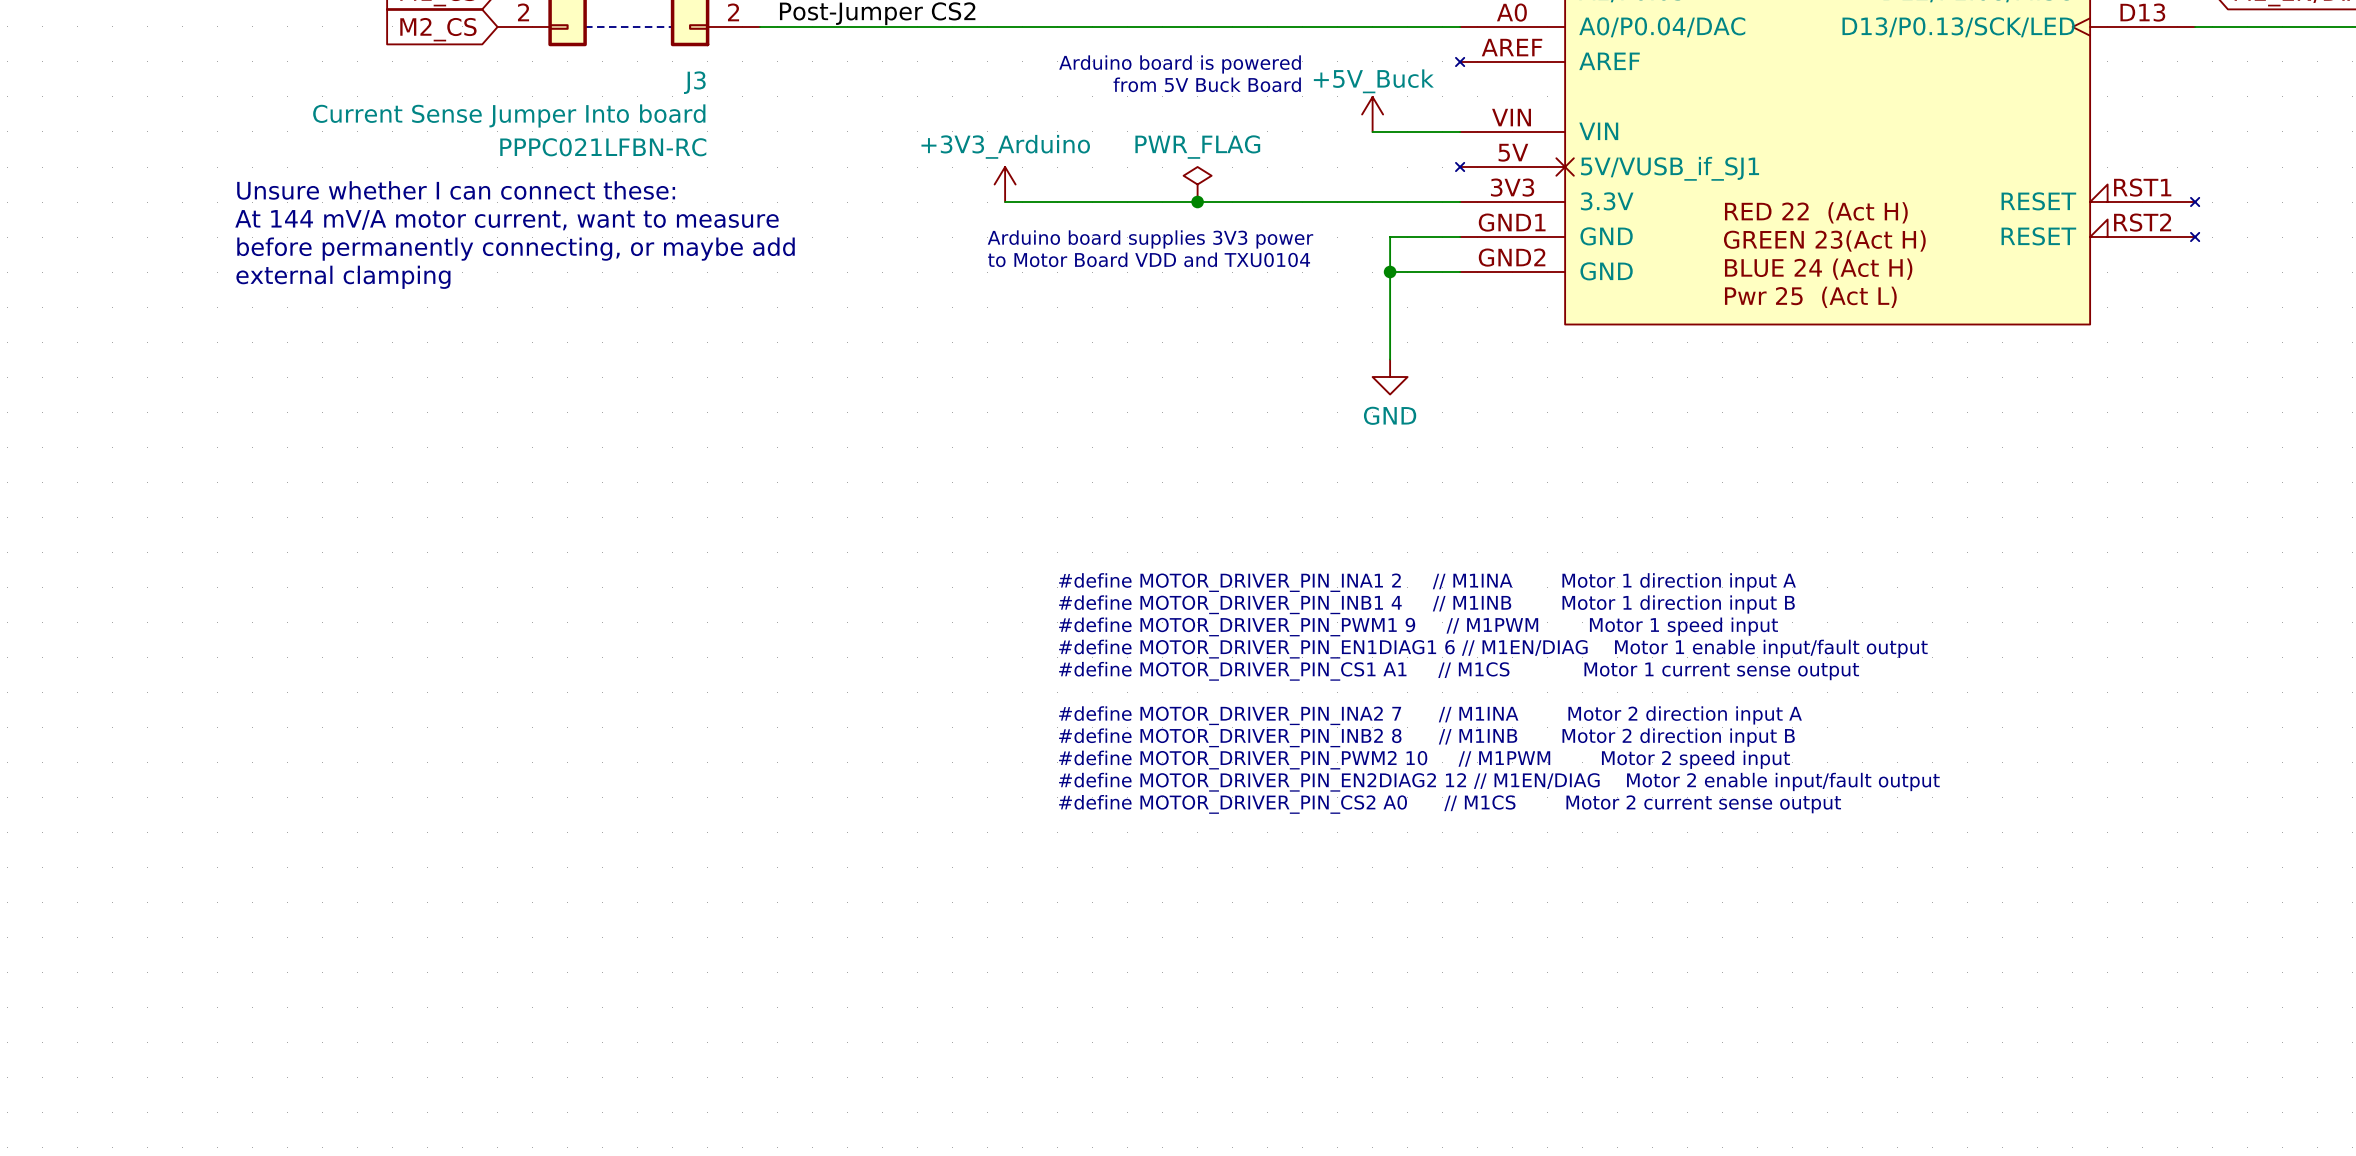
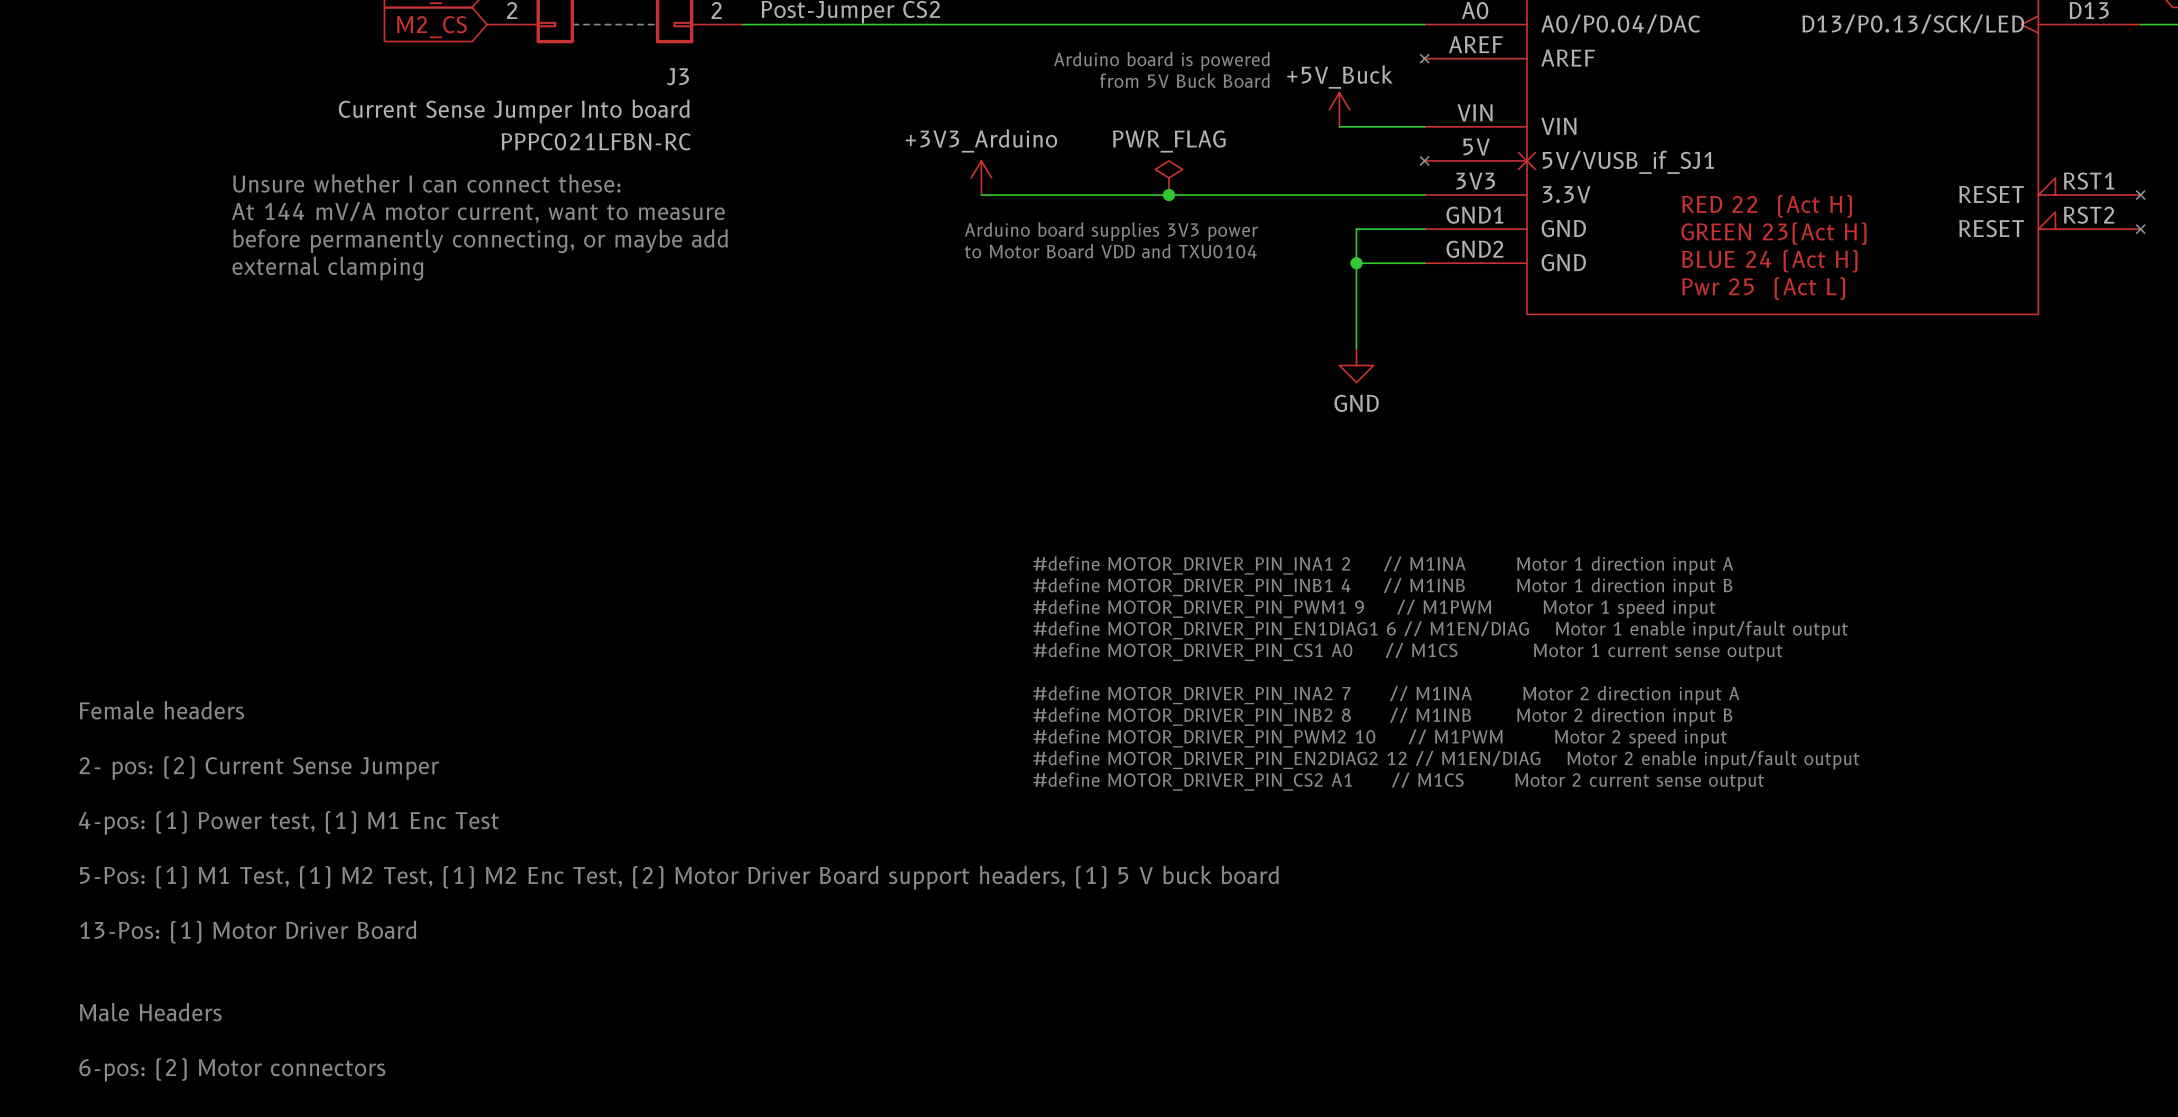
text: #define MOTOR_DRIVER_PIN_CS1 A1 // M1CS Motor 1 current sense output (1459, 671) -> #define MOTOR_DRIVER_PIN_CS1 A0 // M1CS Motor 1 current sense output (1408, 652)
text: none -> Female headers (161, 710)
text: none -> 2- pos: (2) Current Sense Jumper (259, 767)
text: #define MOTOR_DRIVER_PIN_CS2 A0 // M1CS Motor 2 current sense output (1450, 804) -> #define MOTOR_DRIVER_PIN_CS2 A1 // M1CS Motor 2 current sense output (1398, 781)
text: none -> 4-pos: (1) Power test, (1) M1 Enc Test (288, 822)
text: none -> 5-Pos: (1) M1 Test, (1) M2 Test, (1) M2 Enc Test, (2) Motor Driver Board support headers, (1) 5 V buck board (679, 877)
text: none -> 13-Pos: (1) Motor Driver Board (248, 932)
text: none -> Male Headers (150, 1012)
text: none -> 6-pos: (2) Motor connectors (232, 1069)

